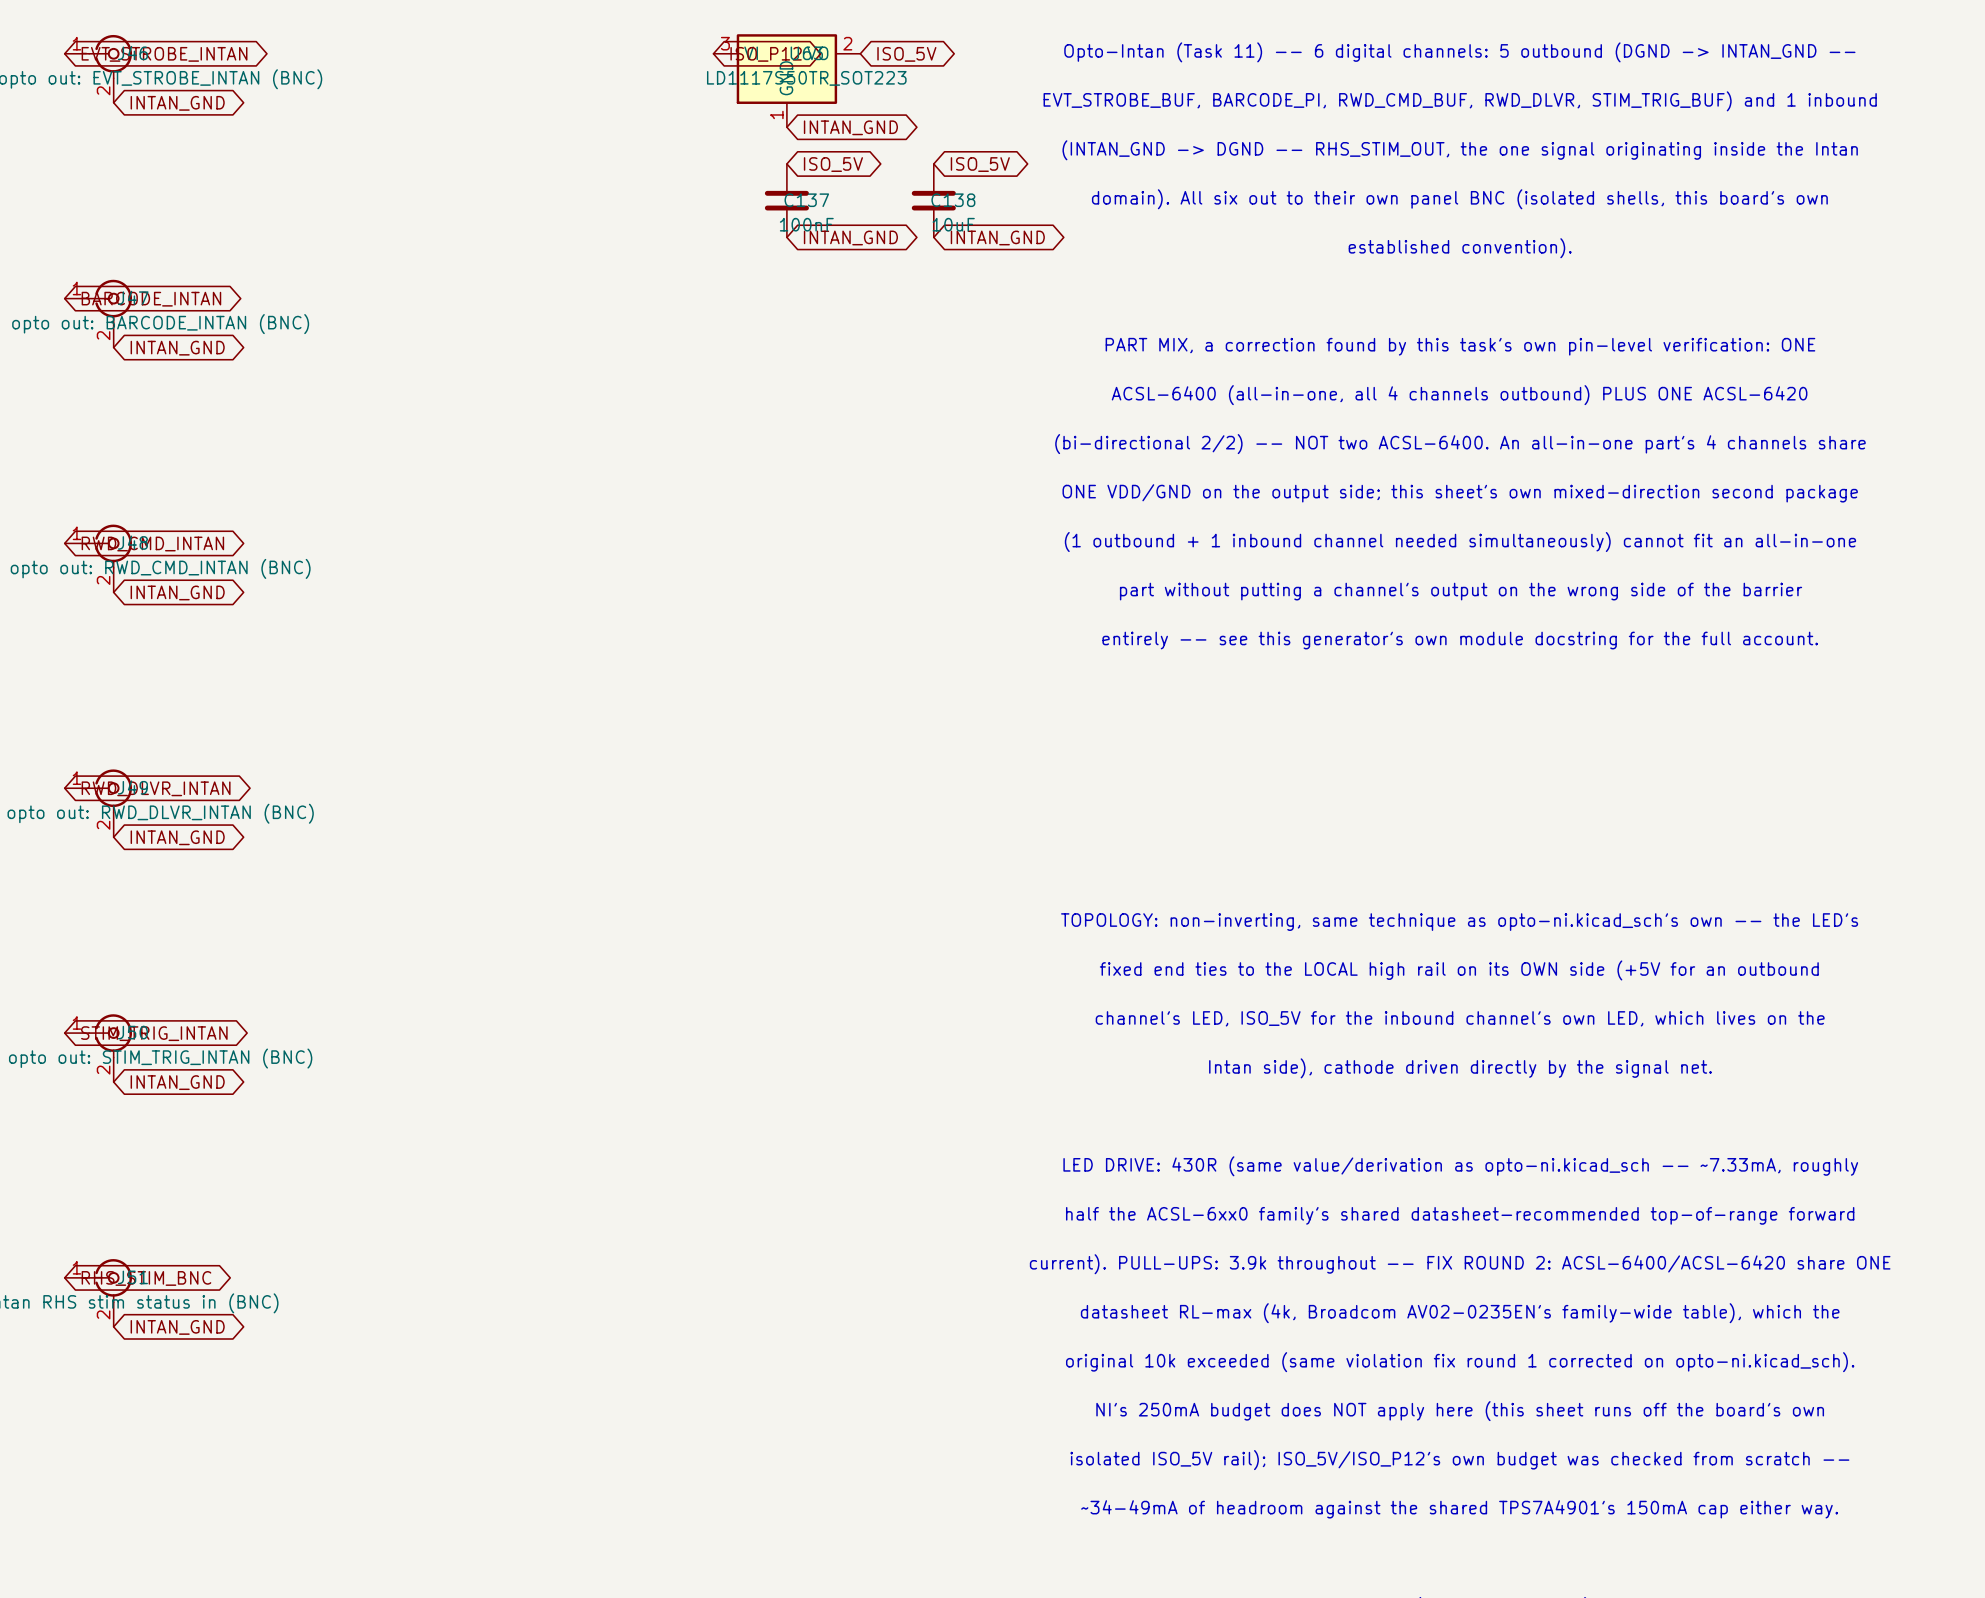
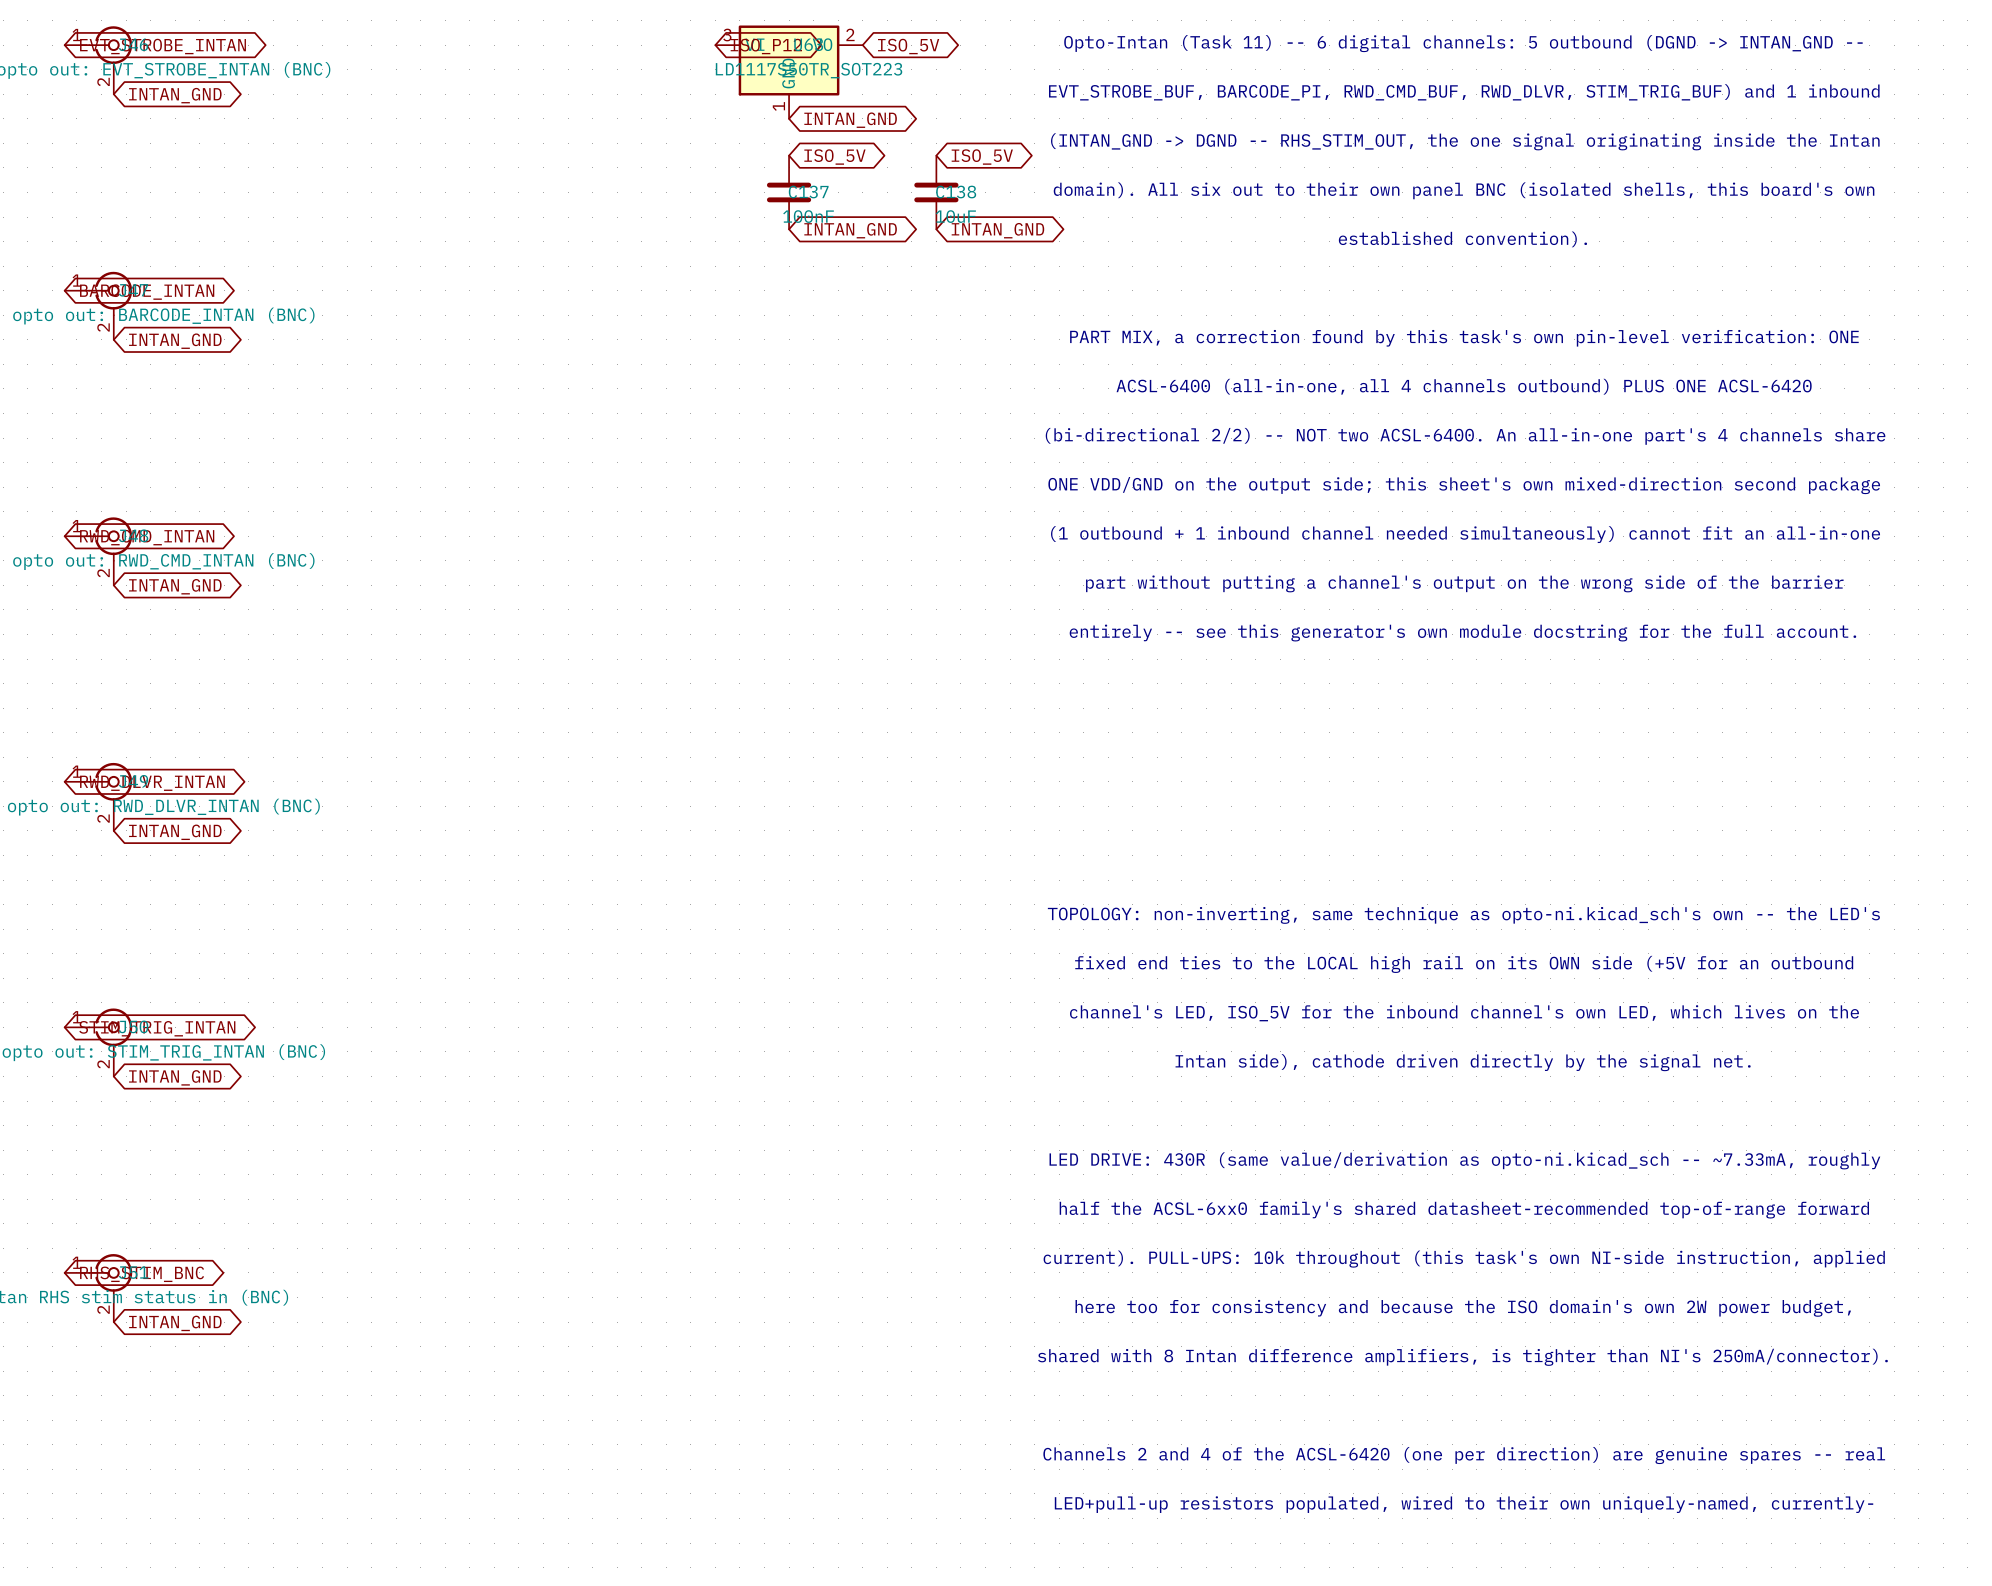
text: current). PULL-UPS: 3.9k throughout -- FIX ROUND 2: ACSL-6400/ACSL-6420 share ONE (1460, 1264) -> current). PULL-UPS: 10k throughout (this task's own NI-side instruction, applied (1464, 1259)
text: datasheet RL-max (4k, Broadcom AV02-0235EN's family-wide table), which the (1460, 1313) -> here too for consistency and because the ISO domain's own 2W power budget, (1463, 1308)
text: original 10k exceeded (same violation fix round 1 corrected on opto-ni.kicad_sch). (1460, 1362) -> shared with 8 Intan difference amplifiers, is tighter than NI's 250mA/connector). (1462, 1357)
text: NI's 250mA budget does NOT apply here (this sheet runs off the board's own (1460, 1411) -> none
text: isolated ISO_5V rail); ISO_5V/ISO_P12's own budget was checked from scratch -- (1459, 1460) -> Channels 2 and 4 of the ACSL-6420 (one per direction) are genuine spares -- real (1464, 1455)
text: ~34-49mA of headroom against the shared TPS7A4901's 150mA cap either way. (1459, 1509) -> LED+pull-up resistors populated, wired to their own uniquely-named, currently- (1464, 1504)

